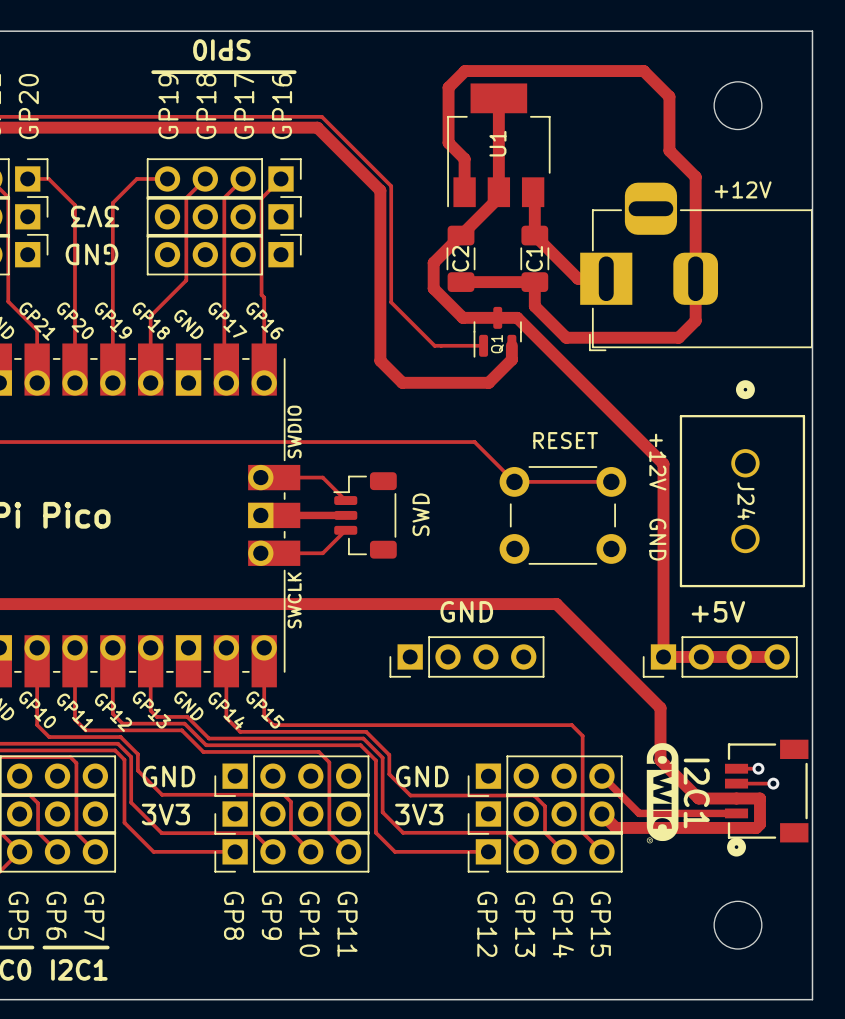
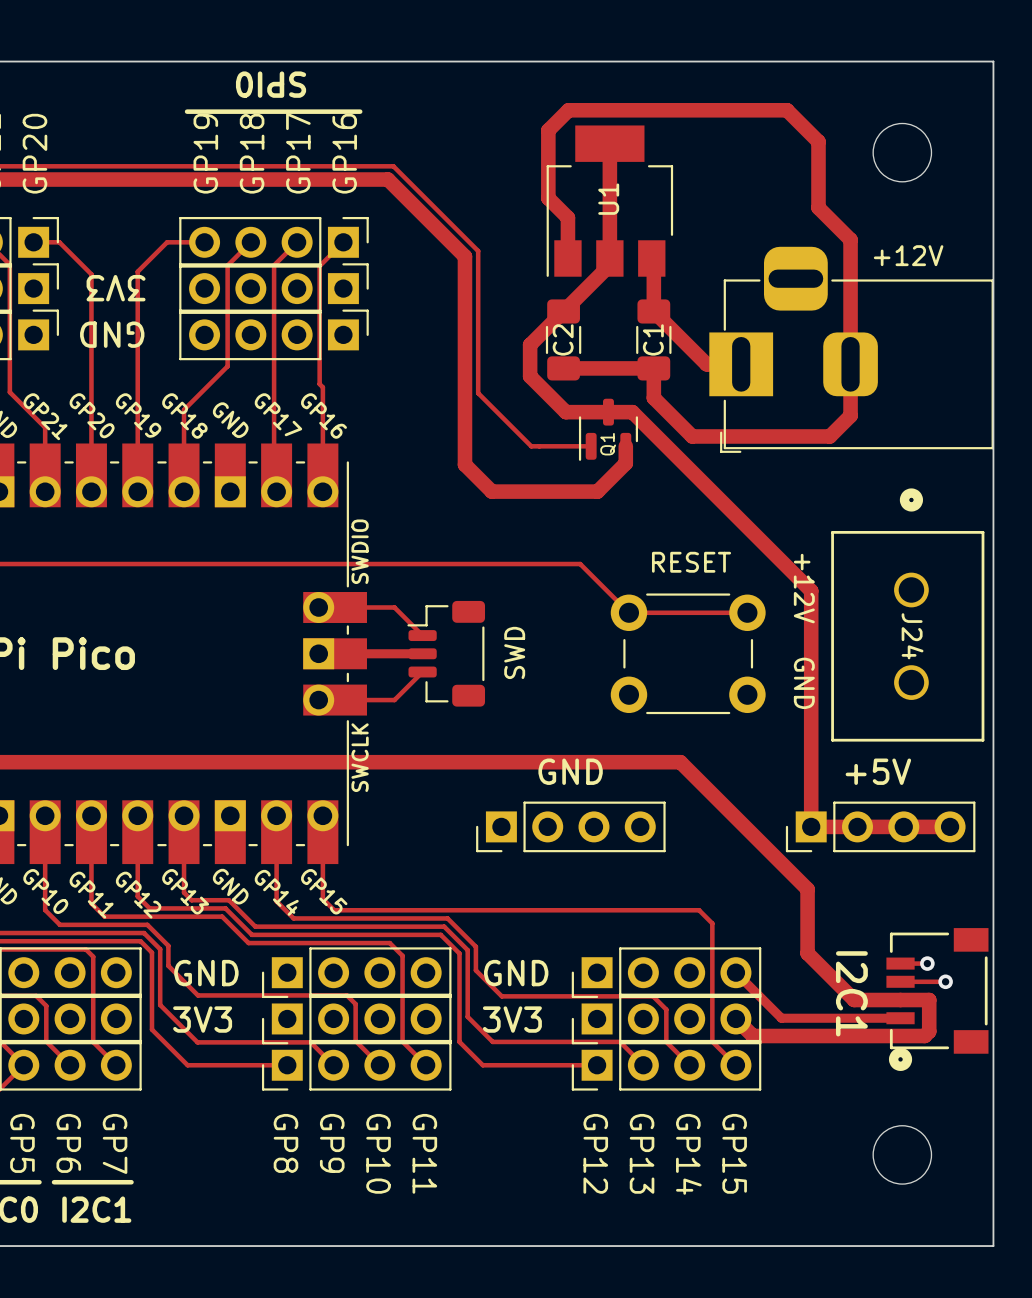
drawing: [646, 743, 679, 844] -> none

